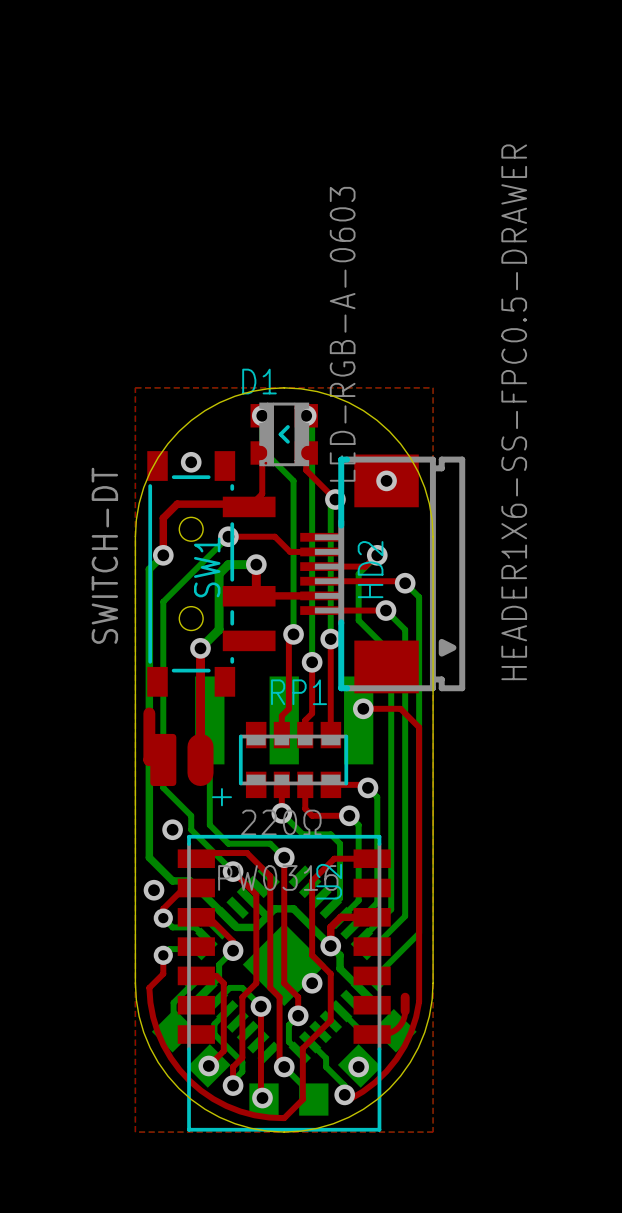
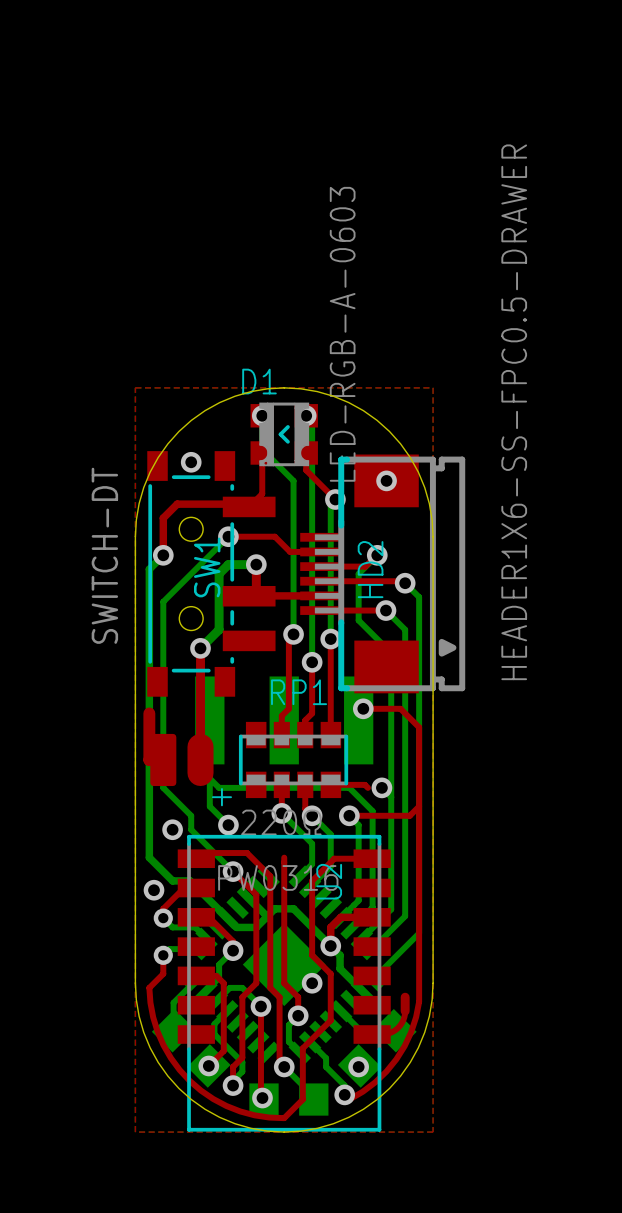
bottom track: (367, 787) (377, 797) (377, 902) (372, 907) -> (209, 778) (219, 787) (349, 787) (372, 811) (372, 907)
via position: (367, 787) -> (381, 787)
bottom track: (209, 806) (209, 825) (228, 843) (270, 843) (284, 857) -> (209, 806) (228, 825)
top track: none -> (419, 806) (409, 815) (354, 815) (349, 820)
top track: (312, 815) (349, 815) -> none
bottom track: none -> (312, 815) (330, 834) (330, 866) (310, 886)
via: none -> (312, 815)
via: none -> (228, 825)
bottom track: (302, 834) (330, 834) (340, 843) (340, 898) (330, 907) -> (302, 834) (312, 843) (312, 864) (299, 876)
via: (284, 857) -> none

